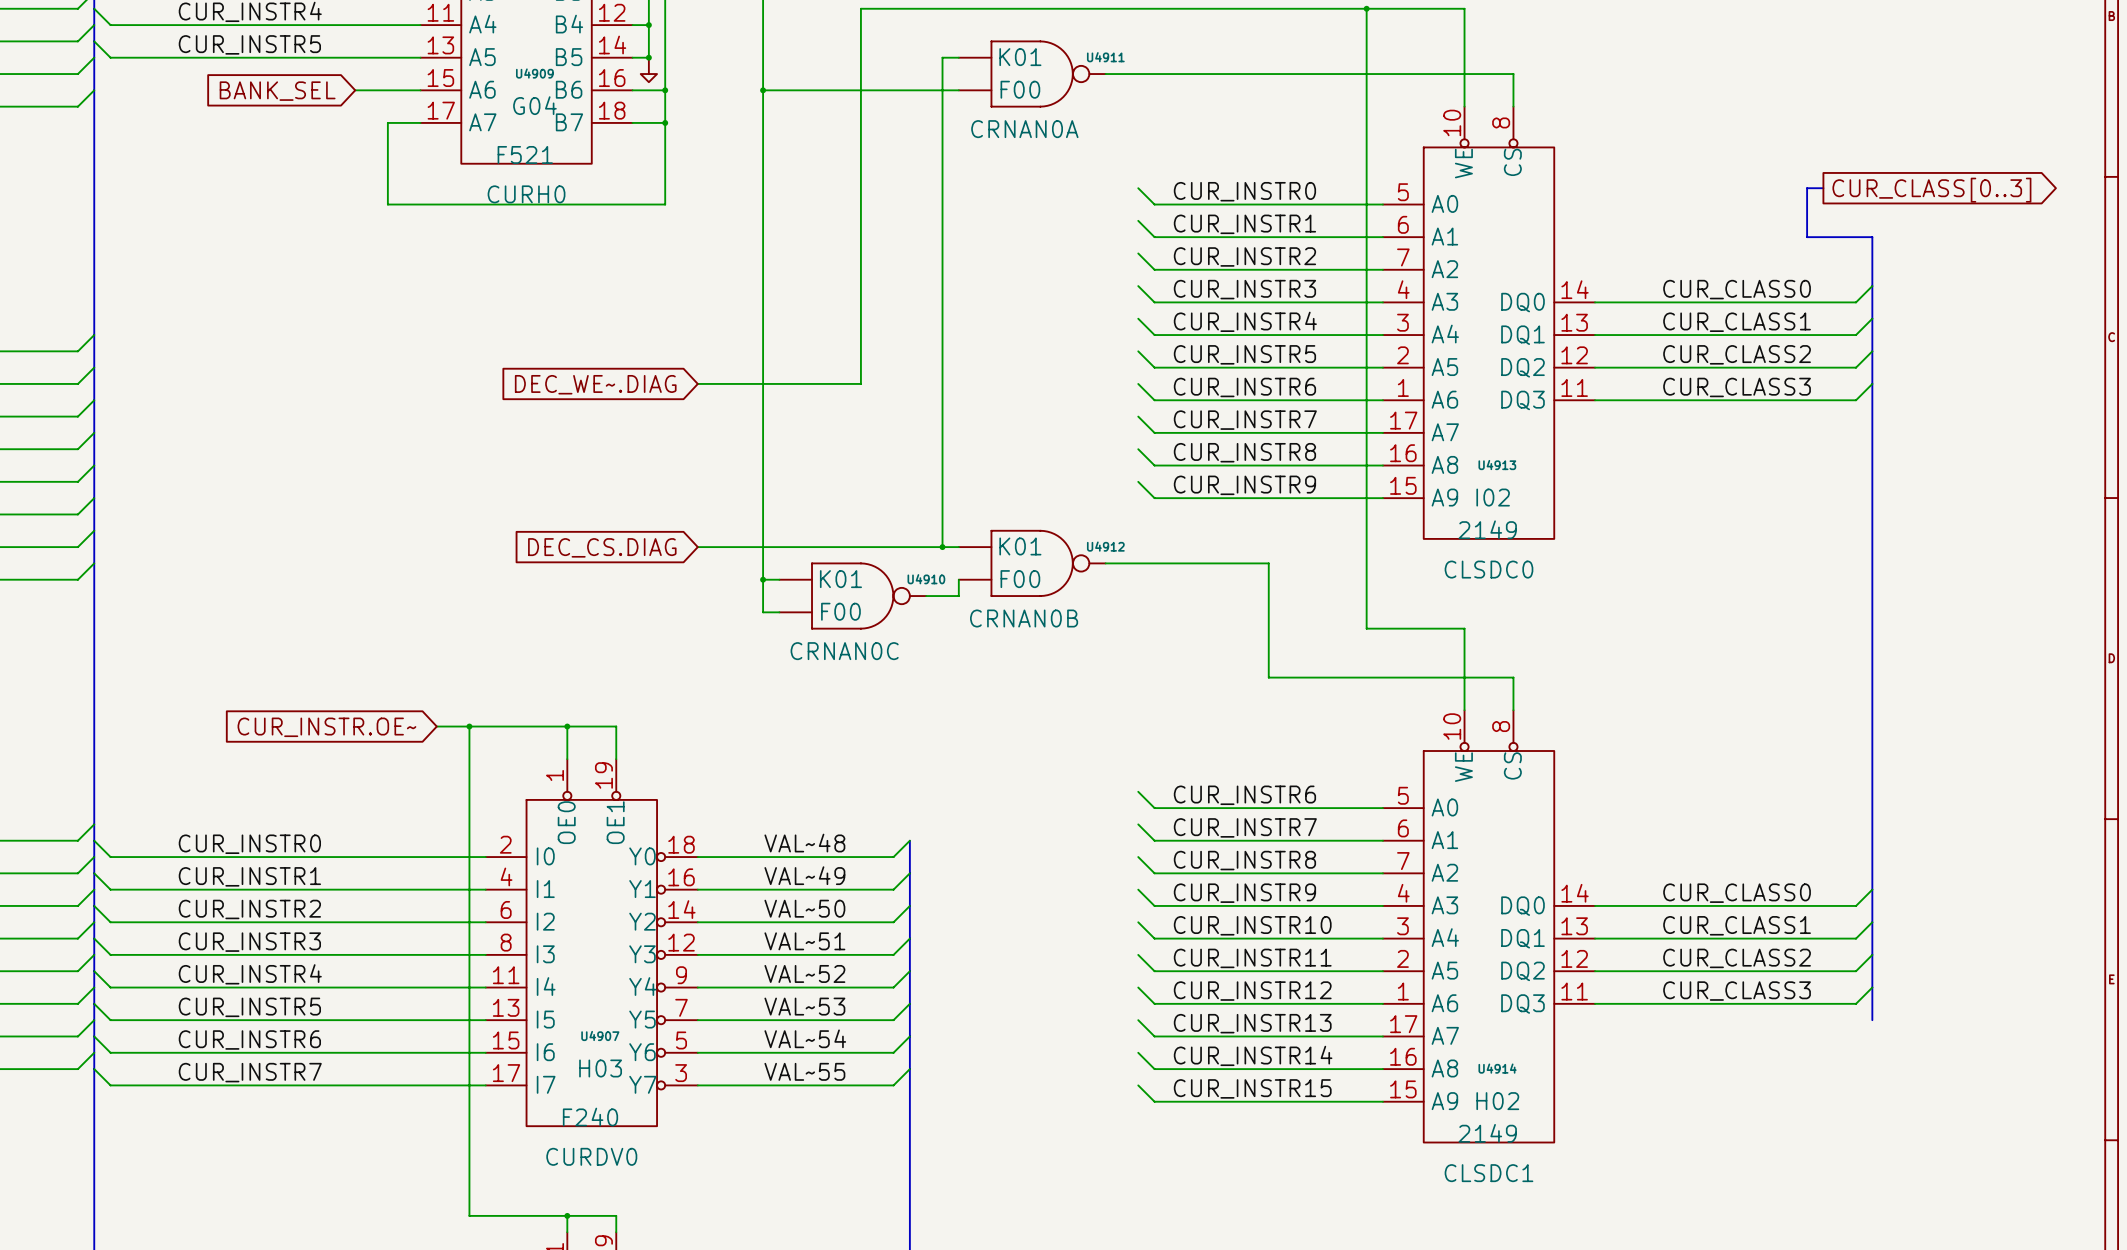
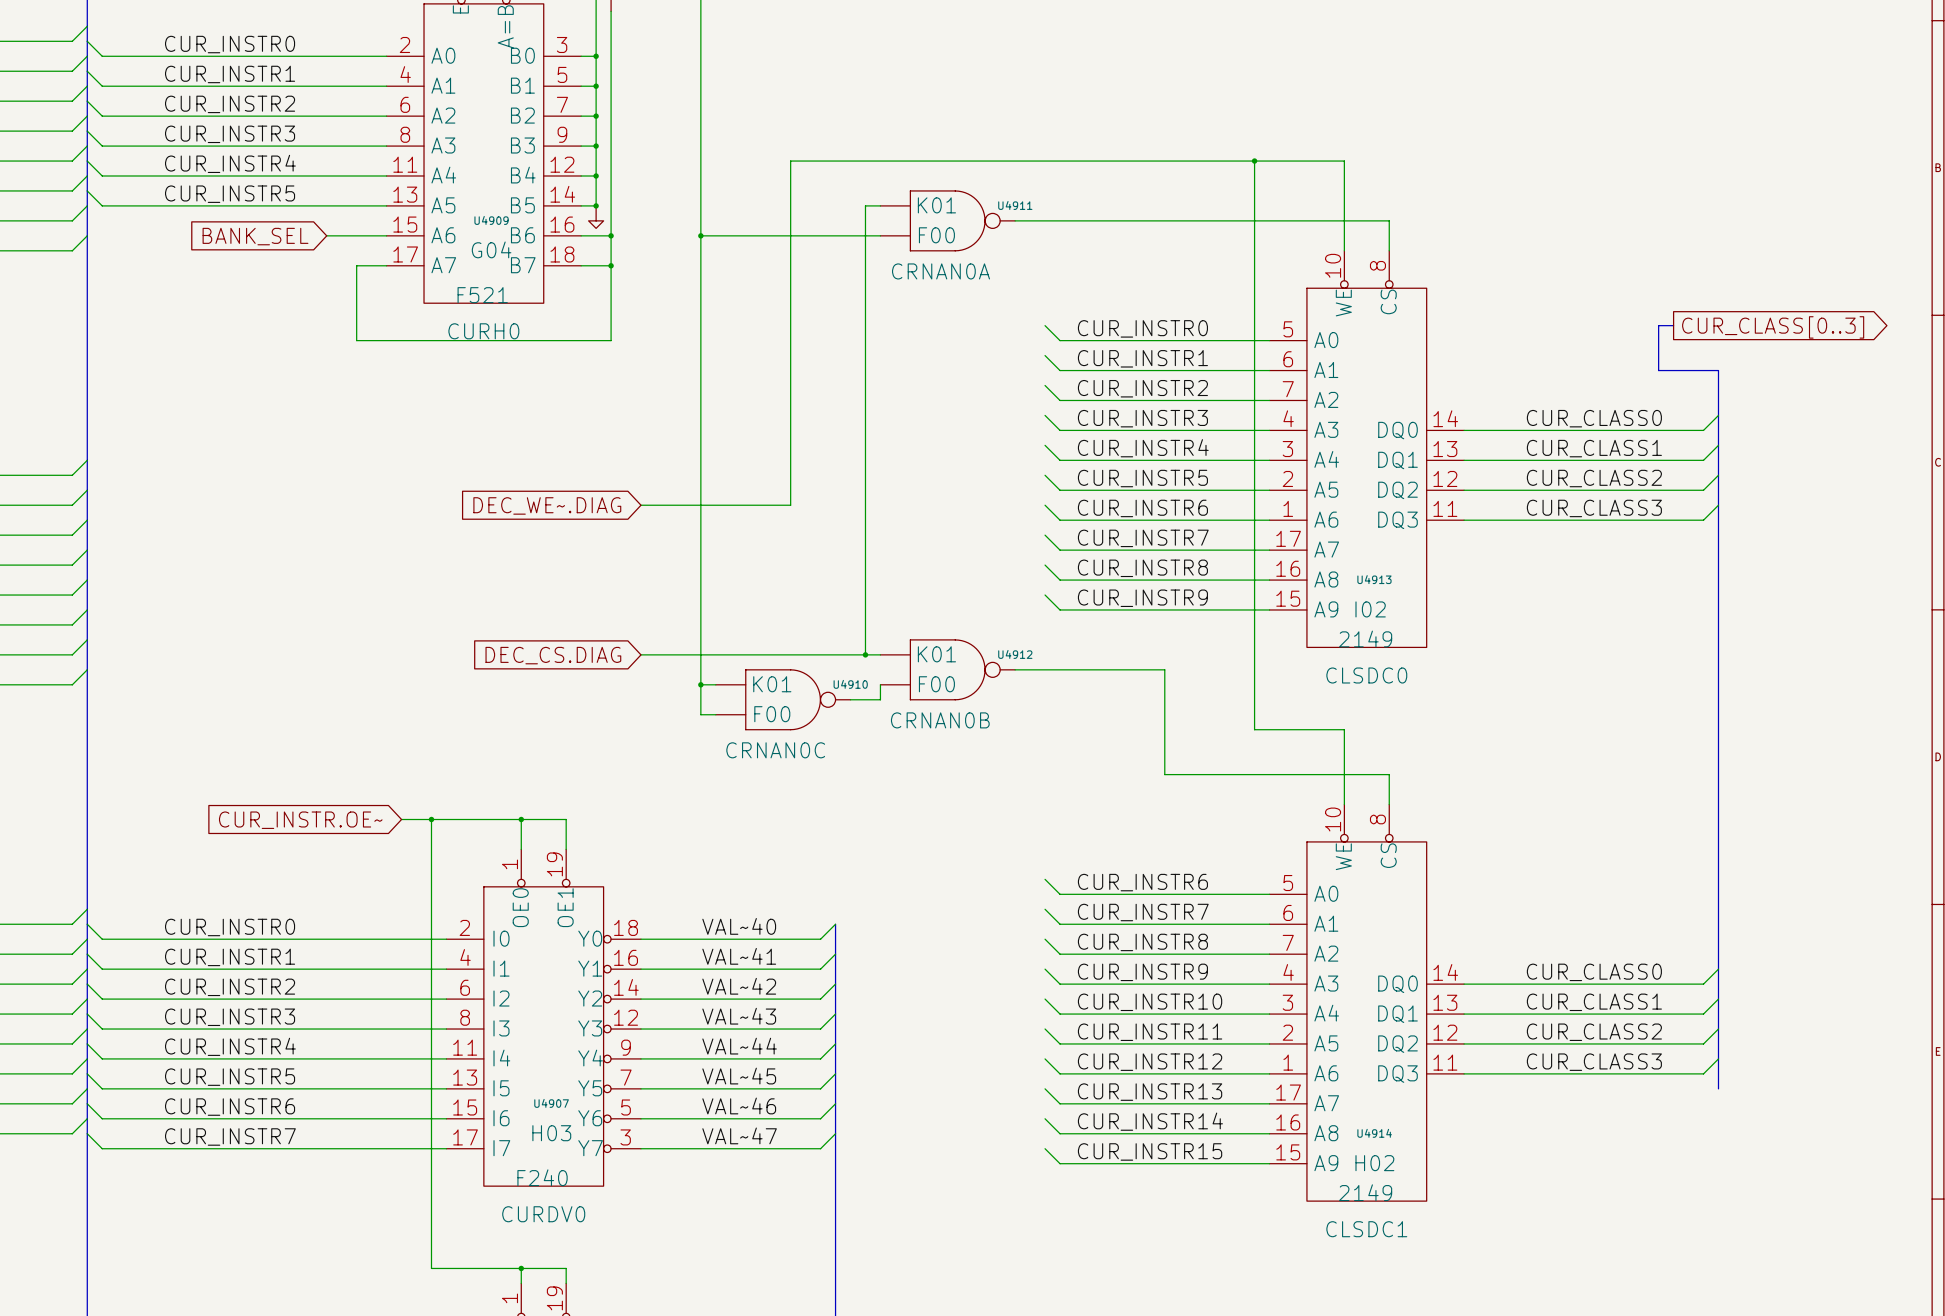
label: VAL~48 (804, 843) -> VAL~40 (739, 926)
label: VAL~49 (804, 875) -> VAL~41 (739, 956)
label: VAL~50 (804, 908) -> VAL~42 (739, 986)
label: VAL~51 (804, 941) -> VAL~43 (739, 1016)
label: VAL~52 (804, 973) -> VAL~44 (739, 1046)
label: VAL~53 (804, 1006) -> VAL~45 (739, 1076)
label: VAL~54 (805, 1038) -> VAL~46 (739, 1105)
label: VAL~55 (804, 1071) -> VAL~47 (739, 1135)

